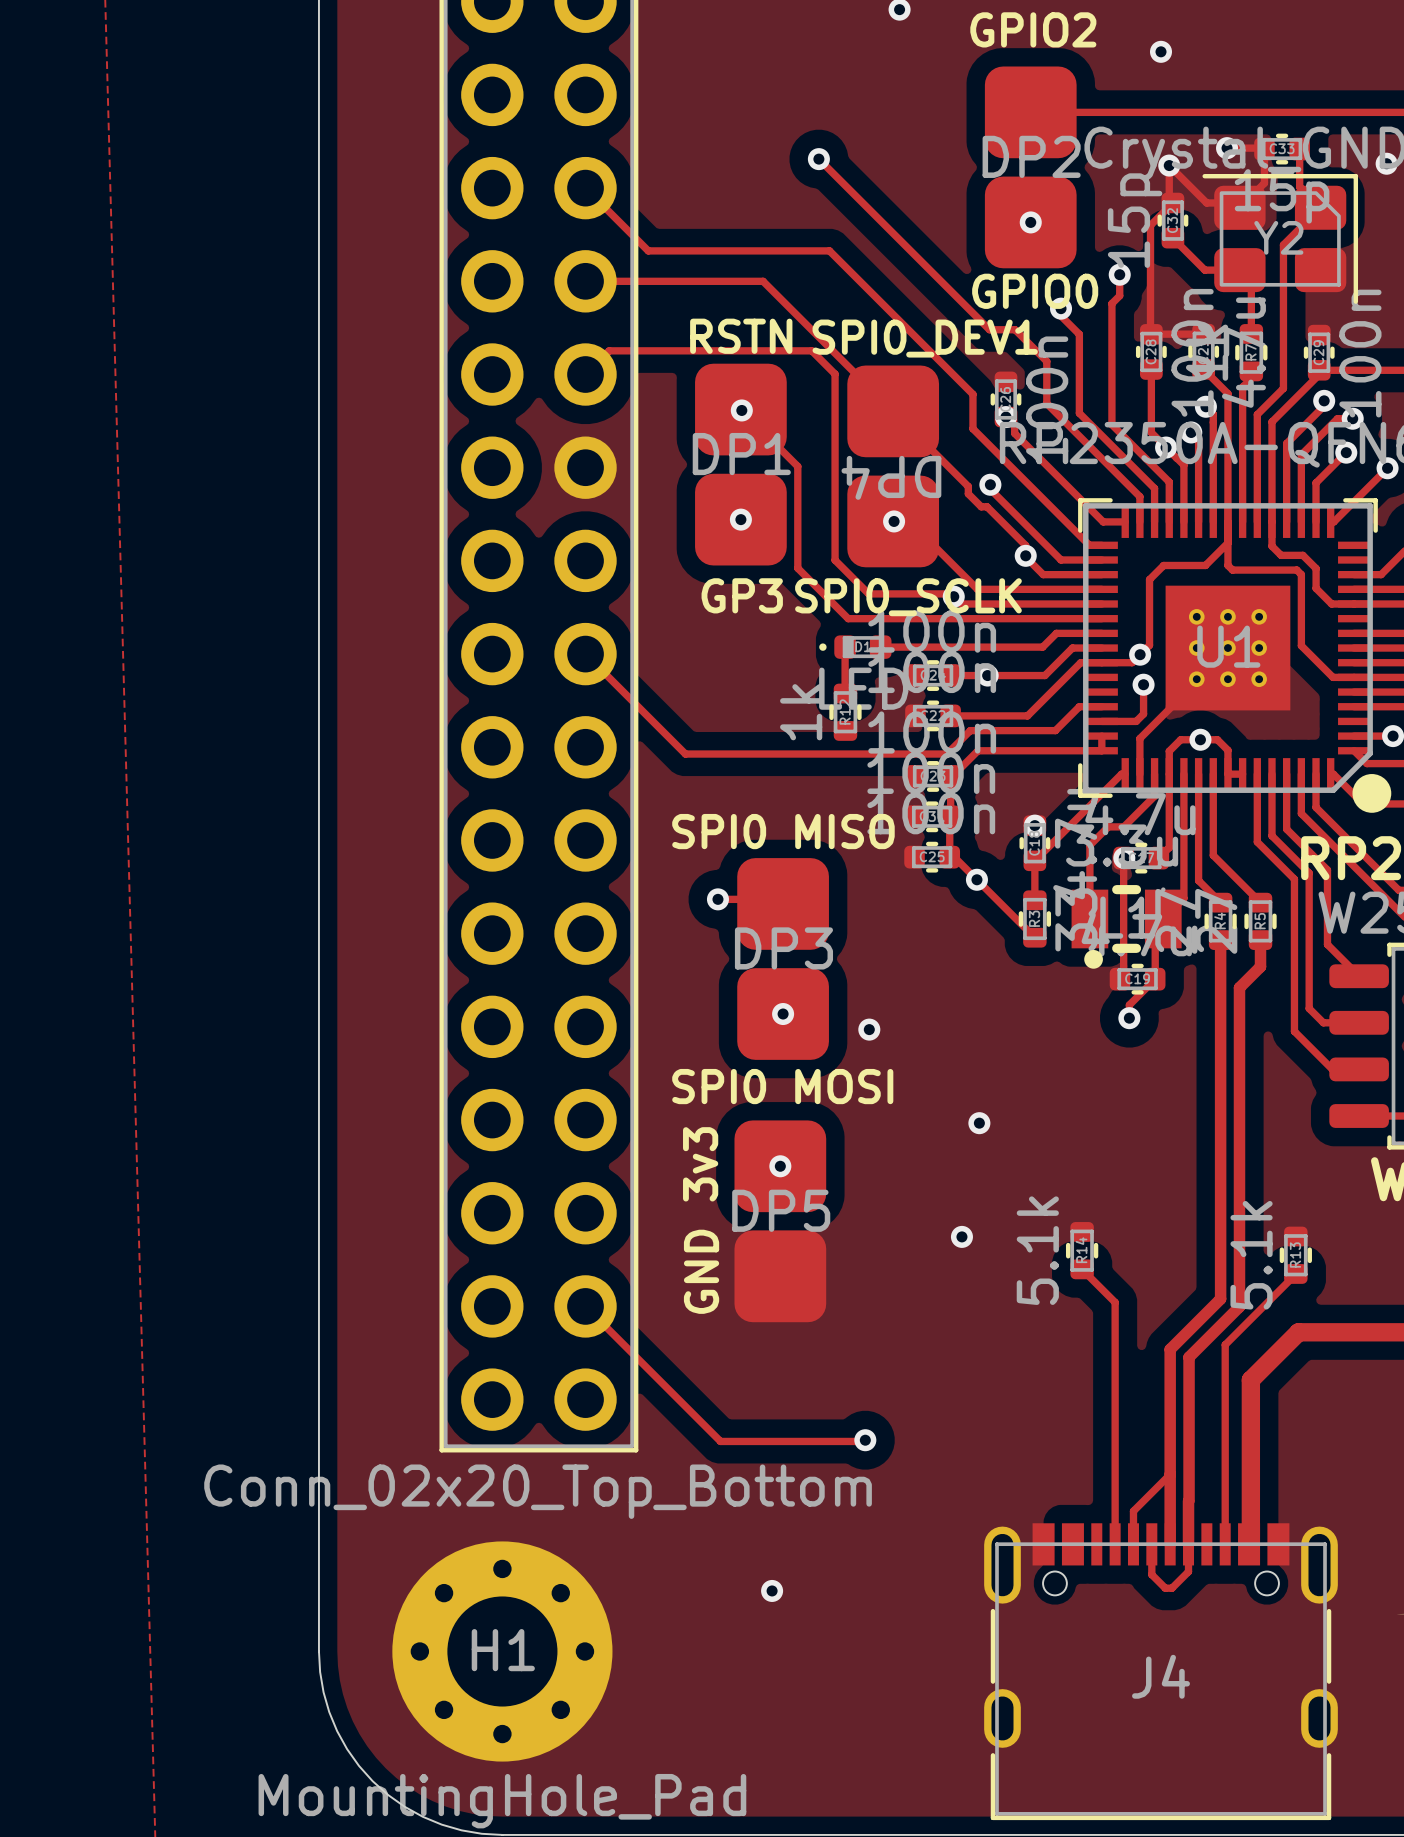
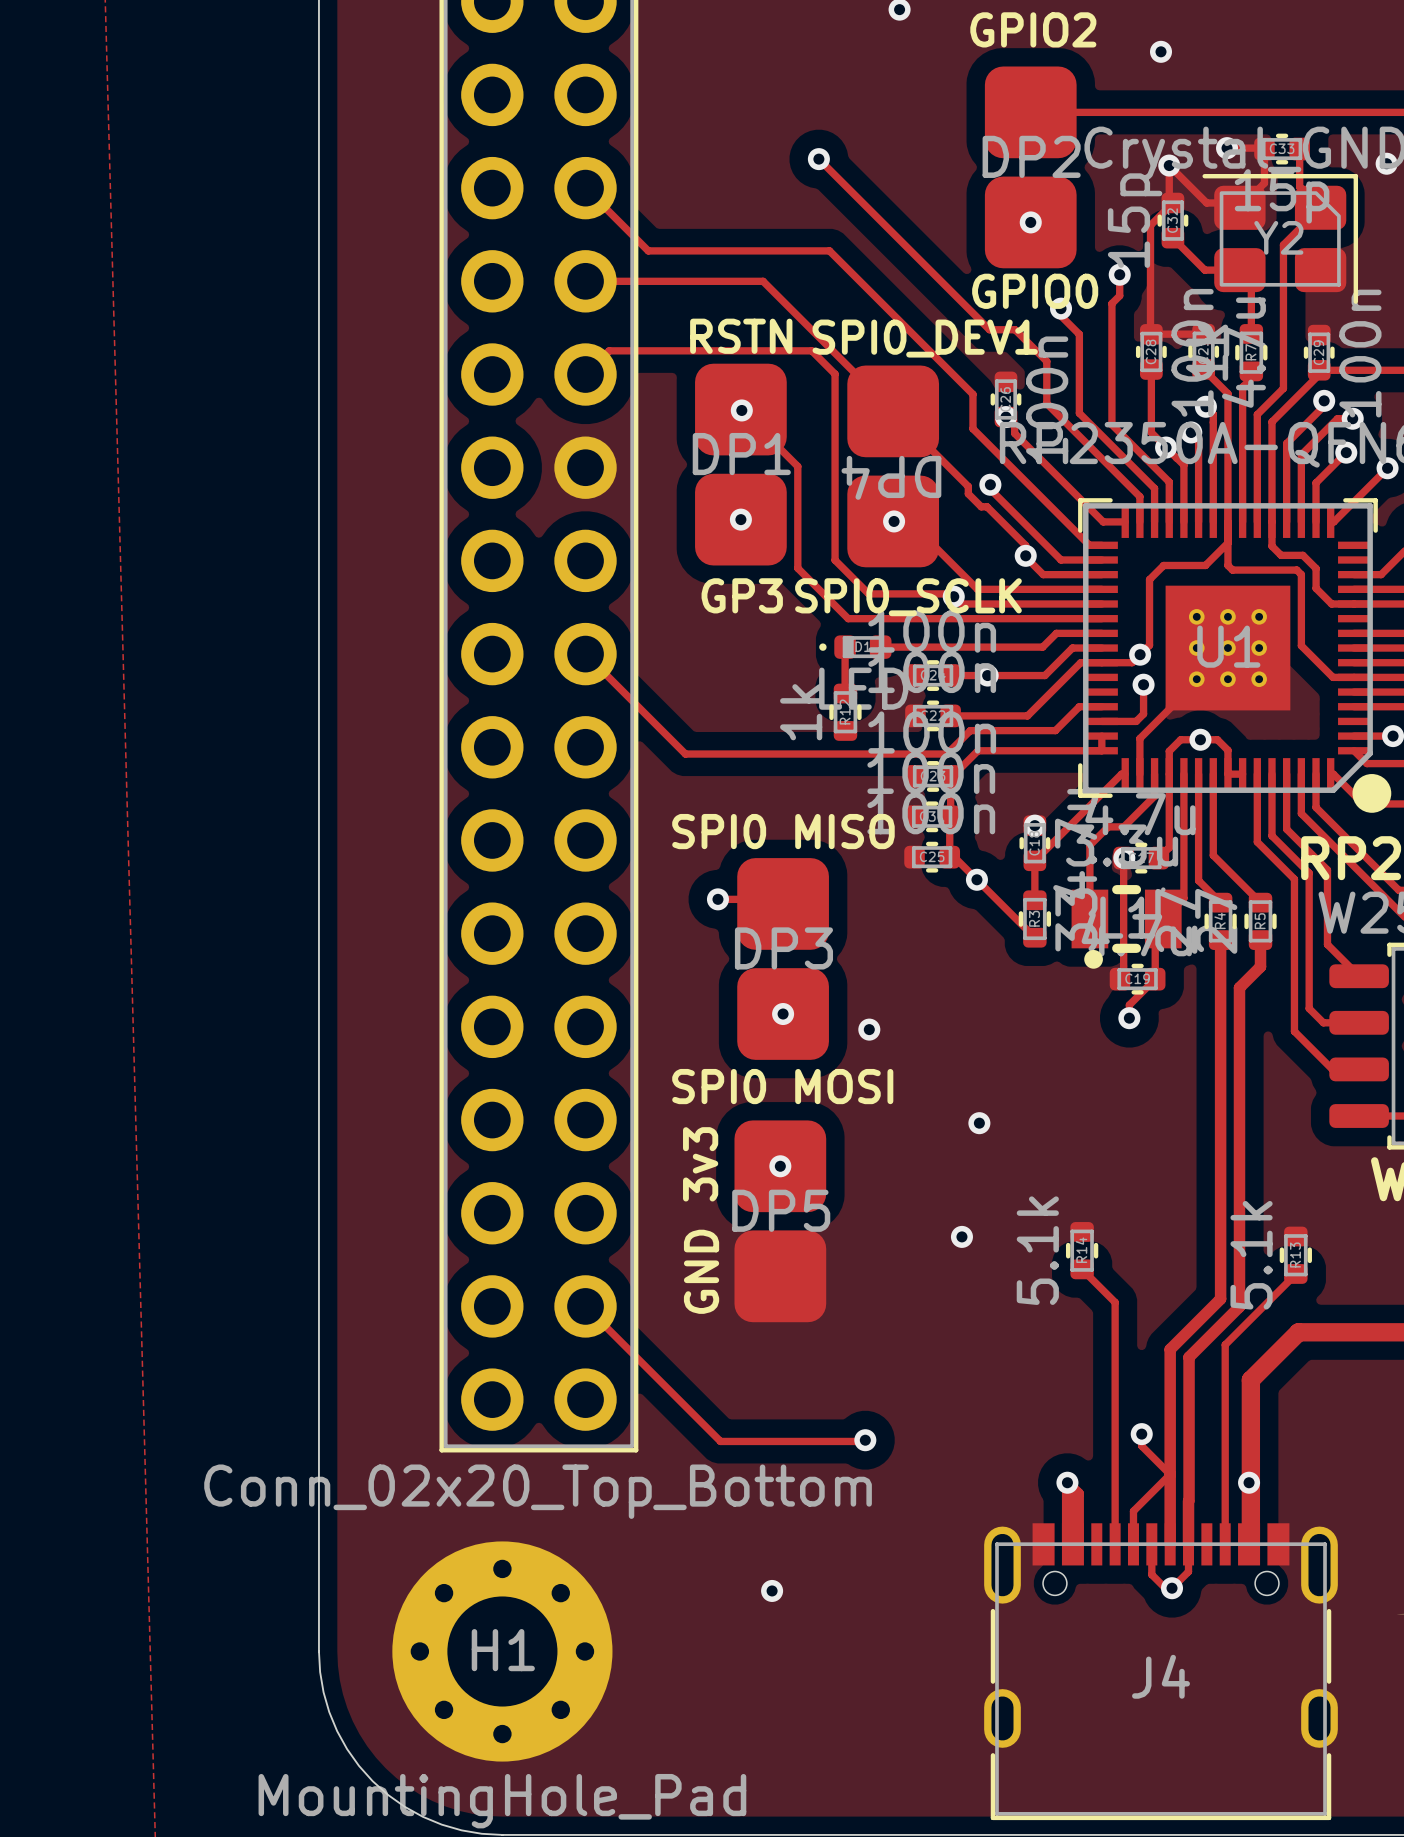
track: none -> (1141, 1434) (1141, 1446) (1170, 1474)
via: none -> (1141, 1434)
via: none -> (1067, 1482)
via: none -> (1249, 1482)
track: none -> (1067, 1544) (1067, 1482) (1078, 1493) (1078, 1544)
via: none -> (1172, 1588)

